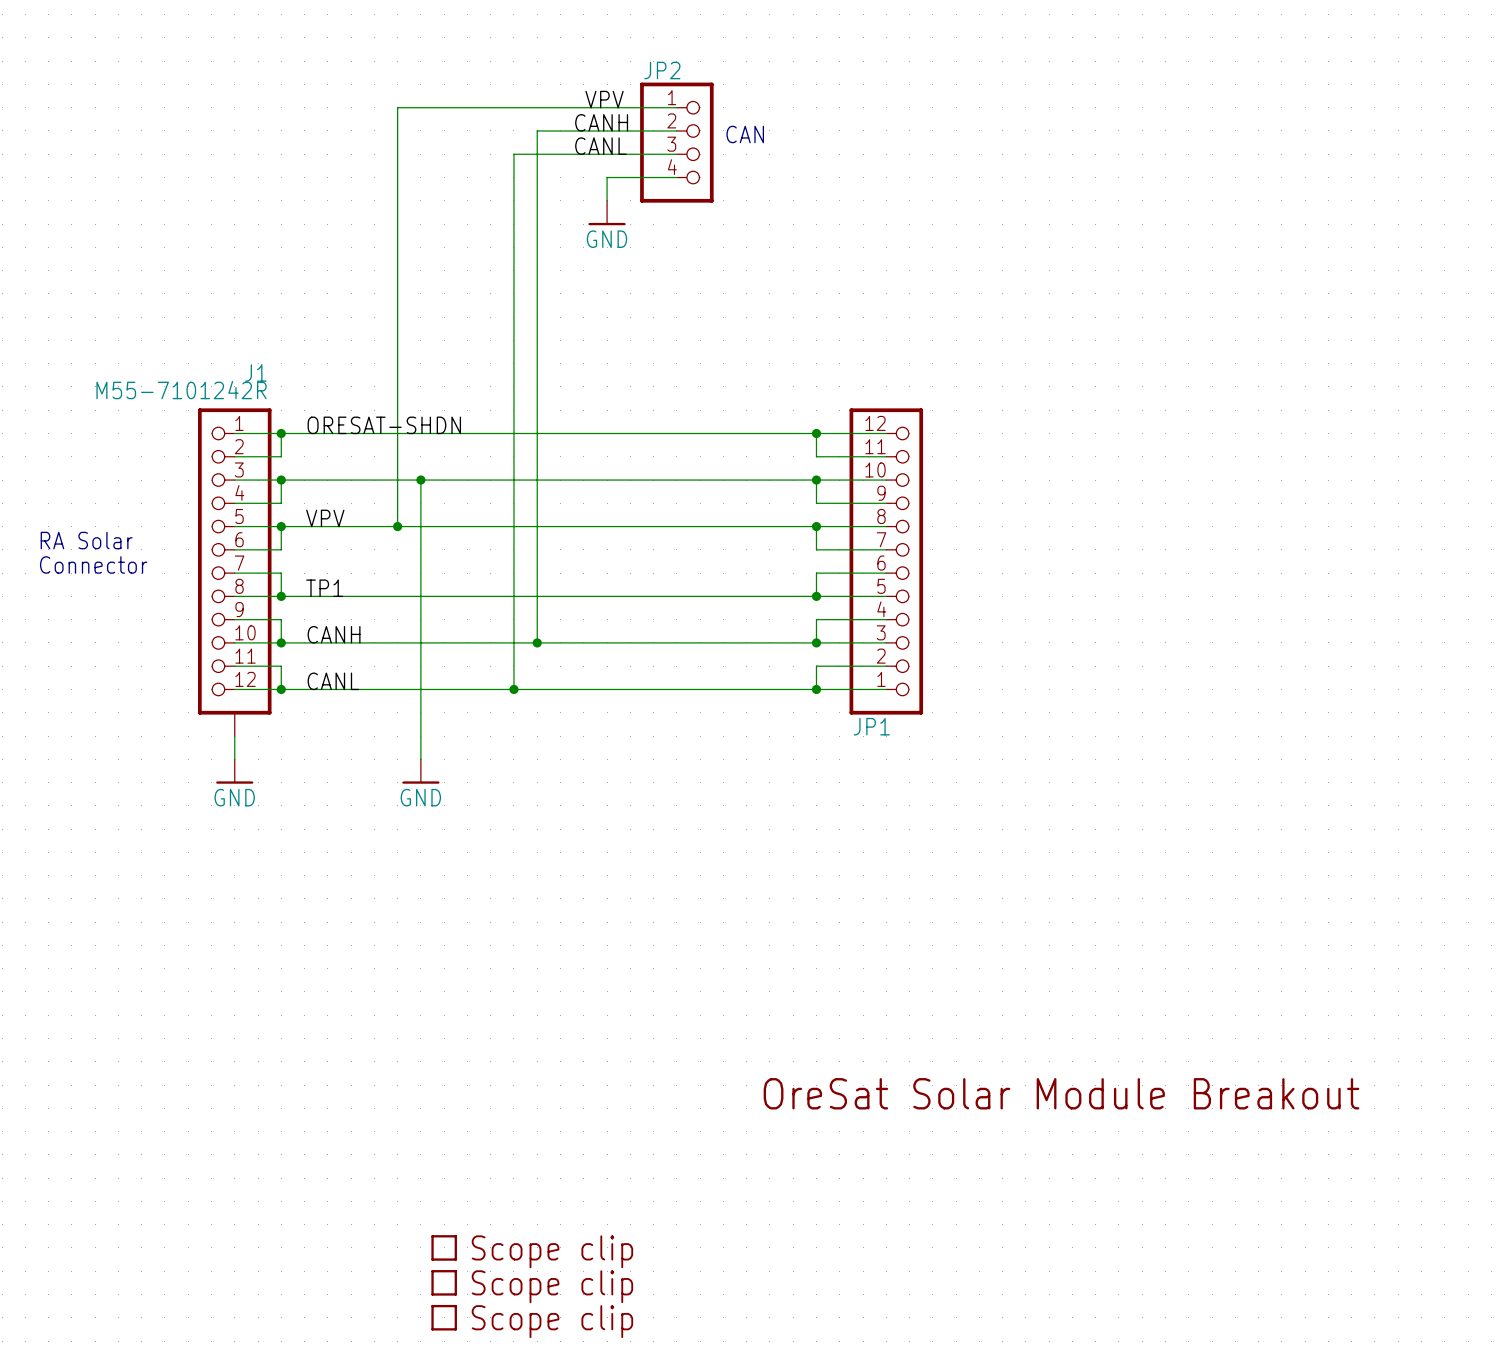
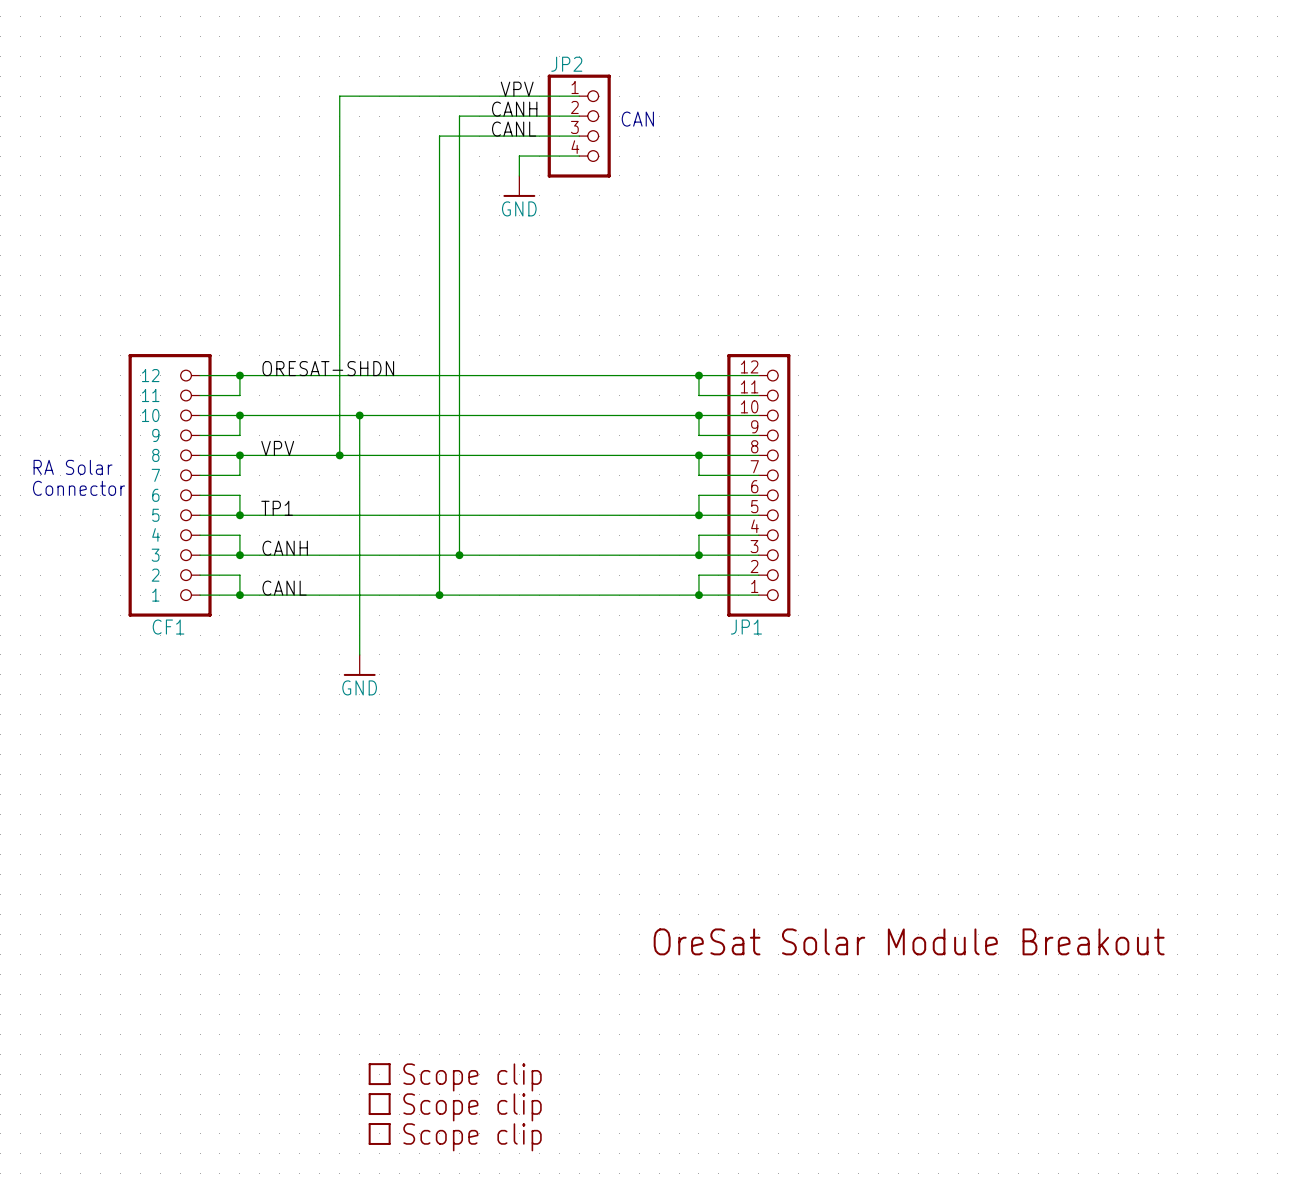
CF1: none -> (170, 485)
J1: M55-7101242R (234, 572) -> none
wire: (234, 736) (234, 759) -> none
power symbol: GND (234, 771) -> none

